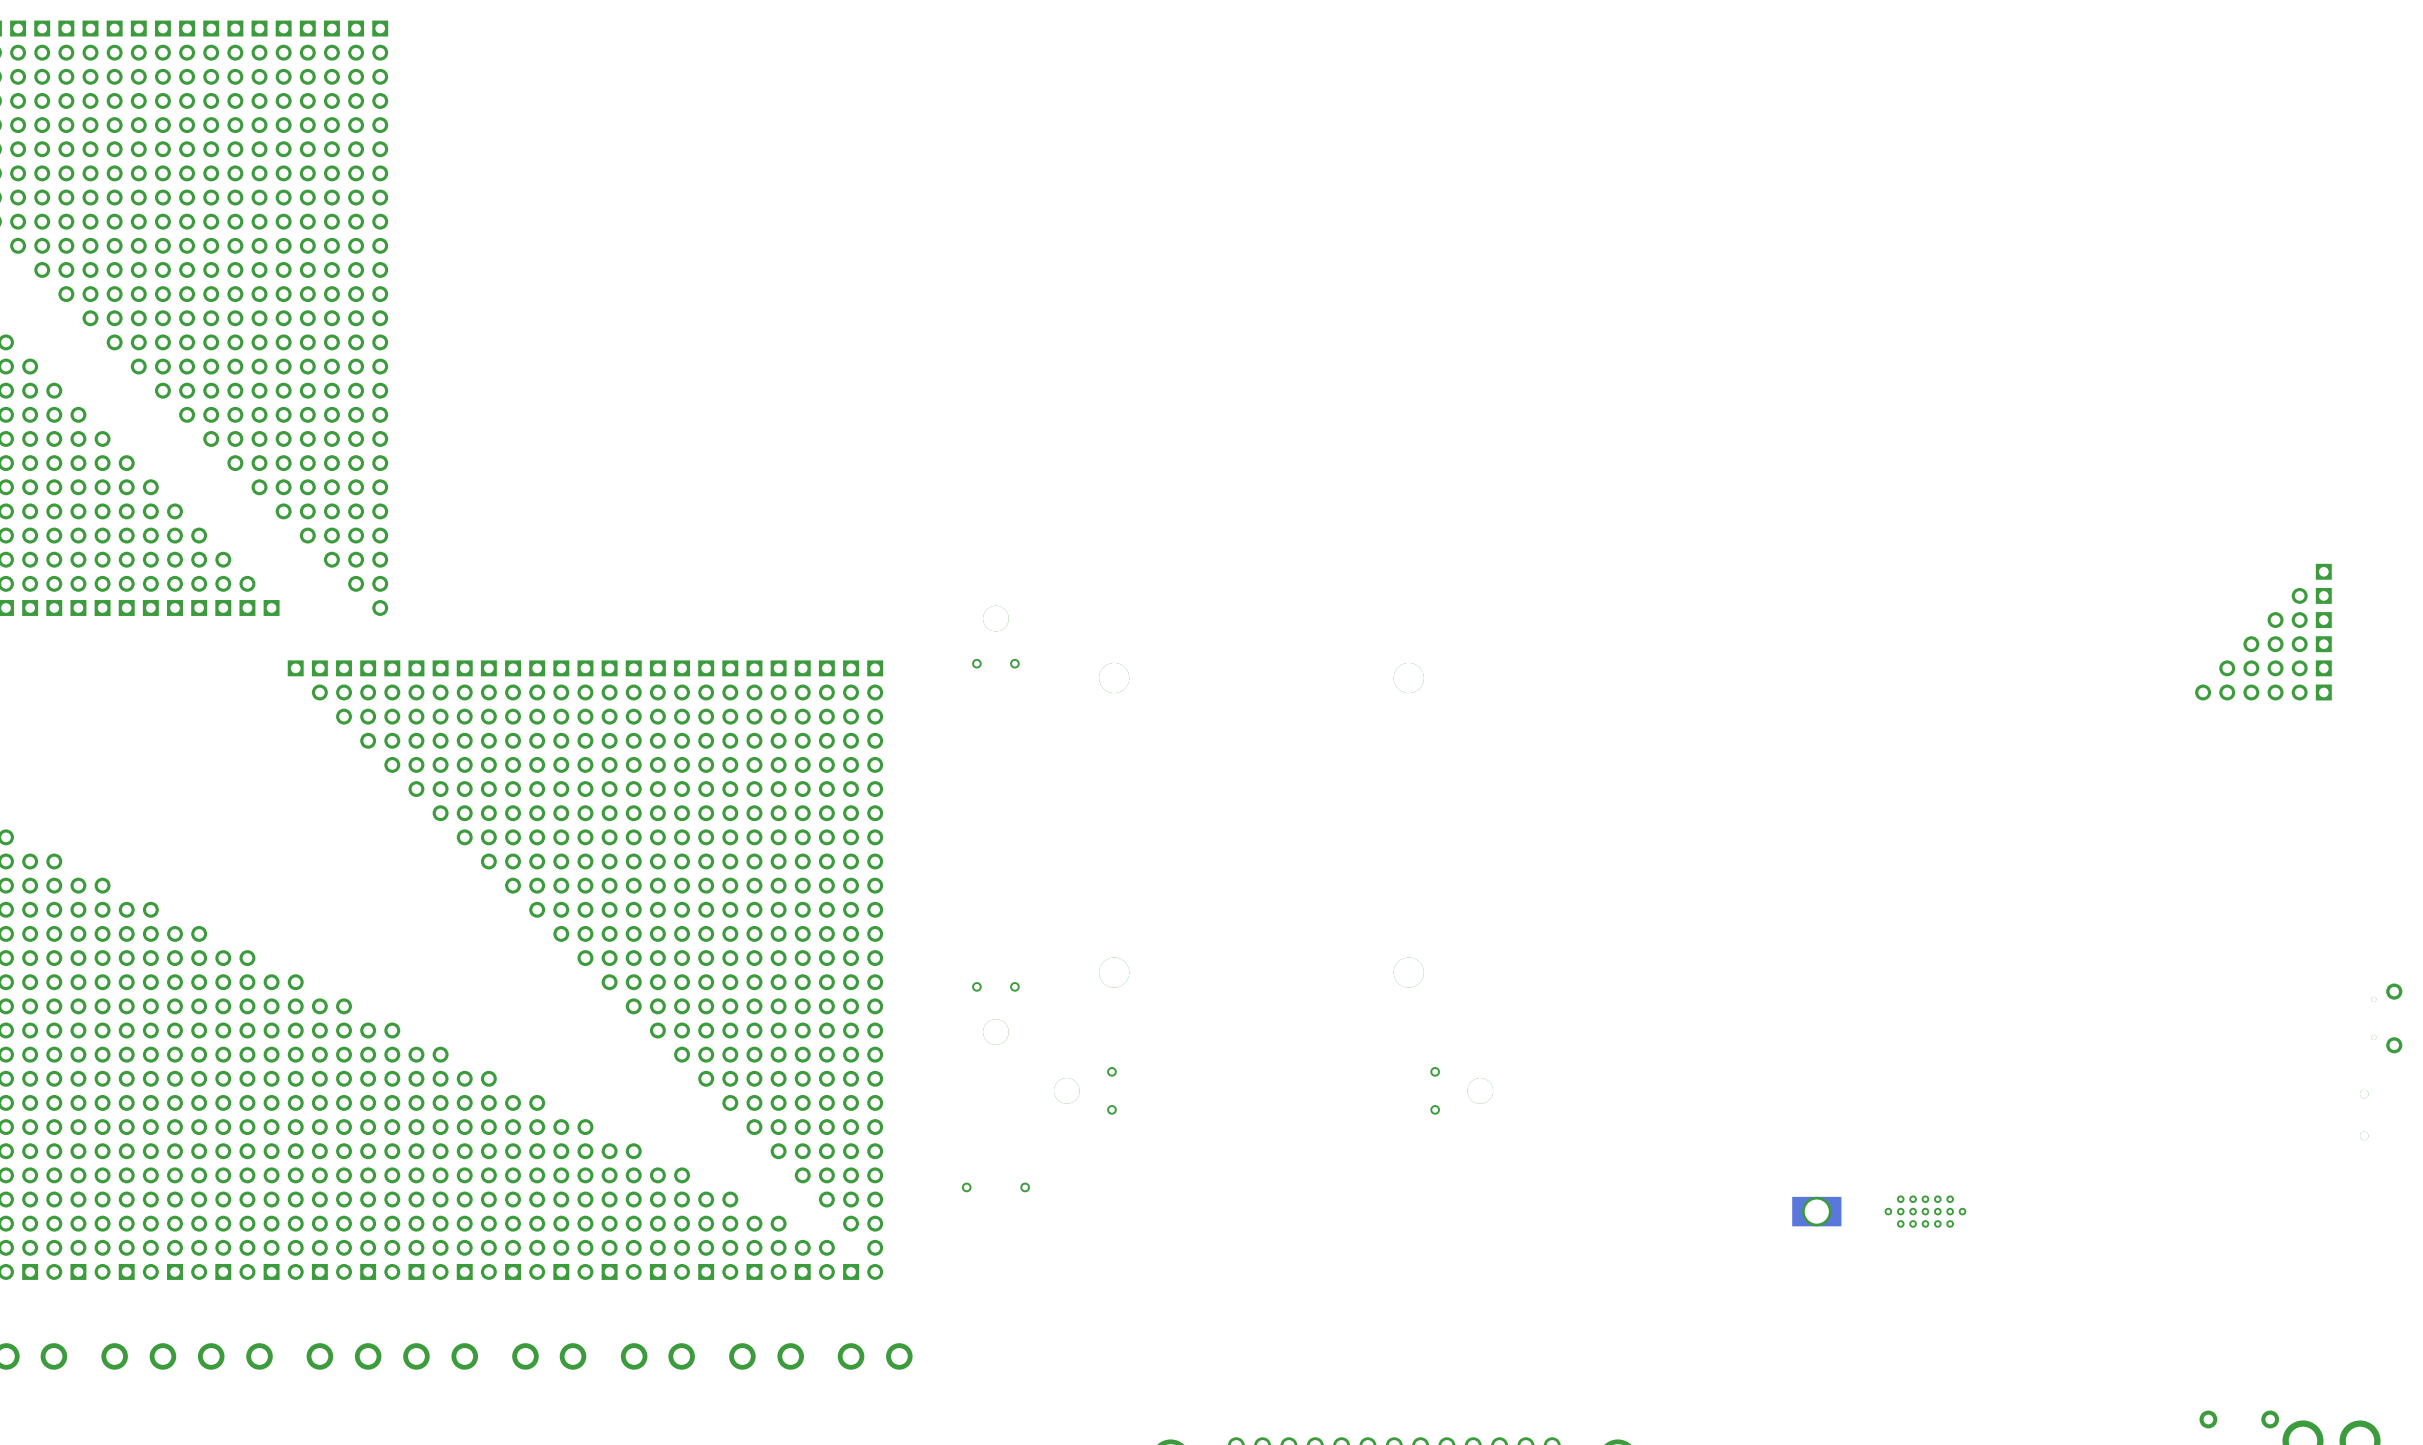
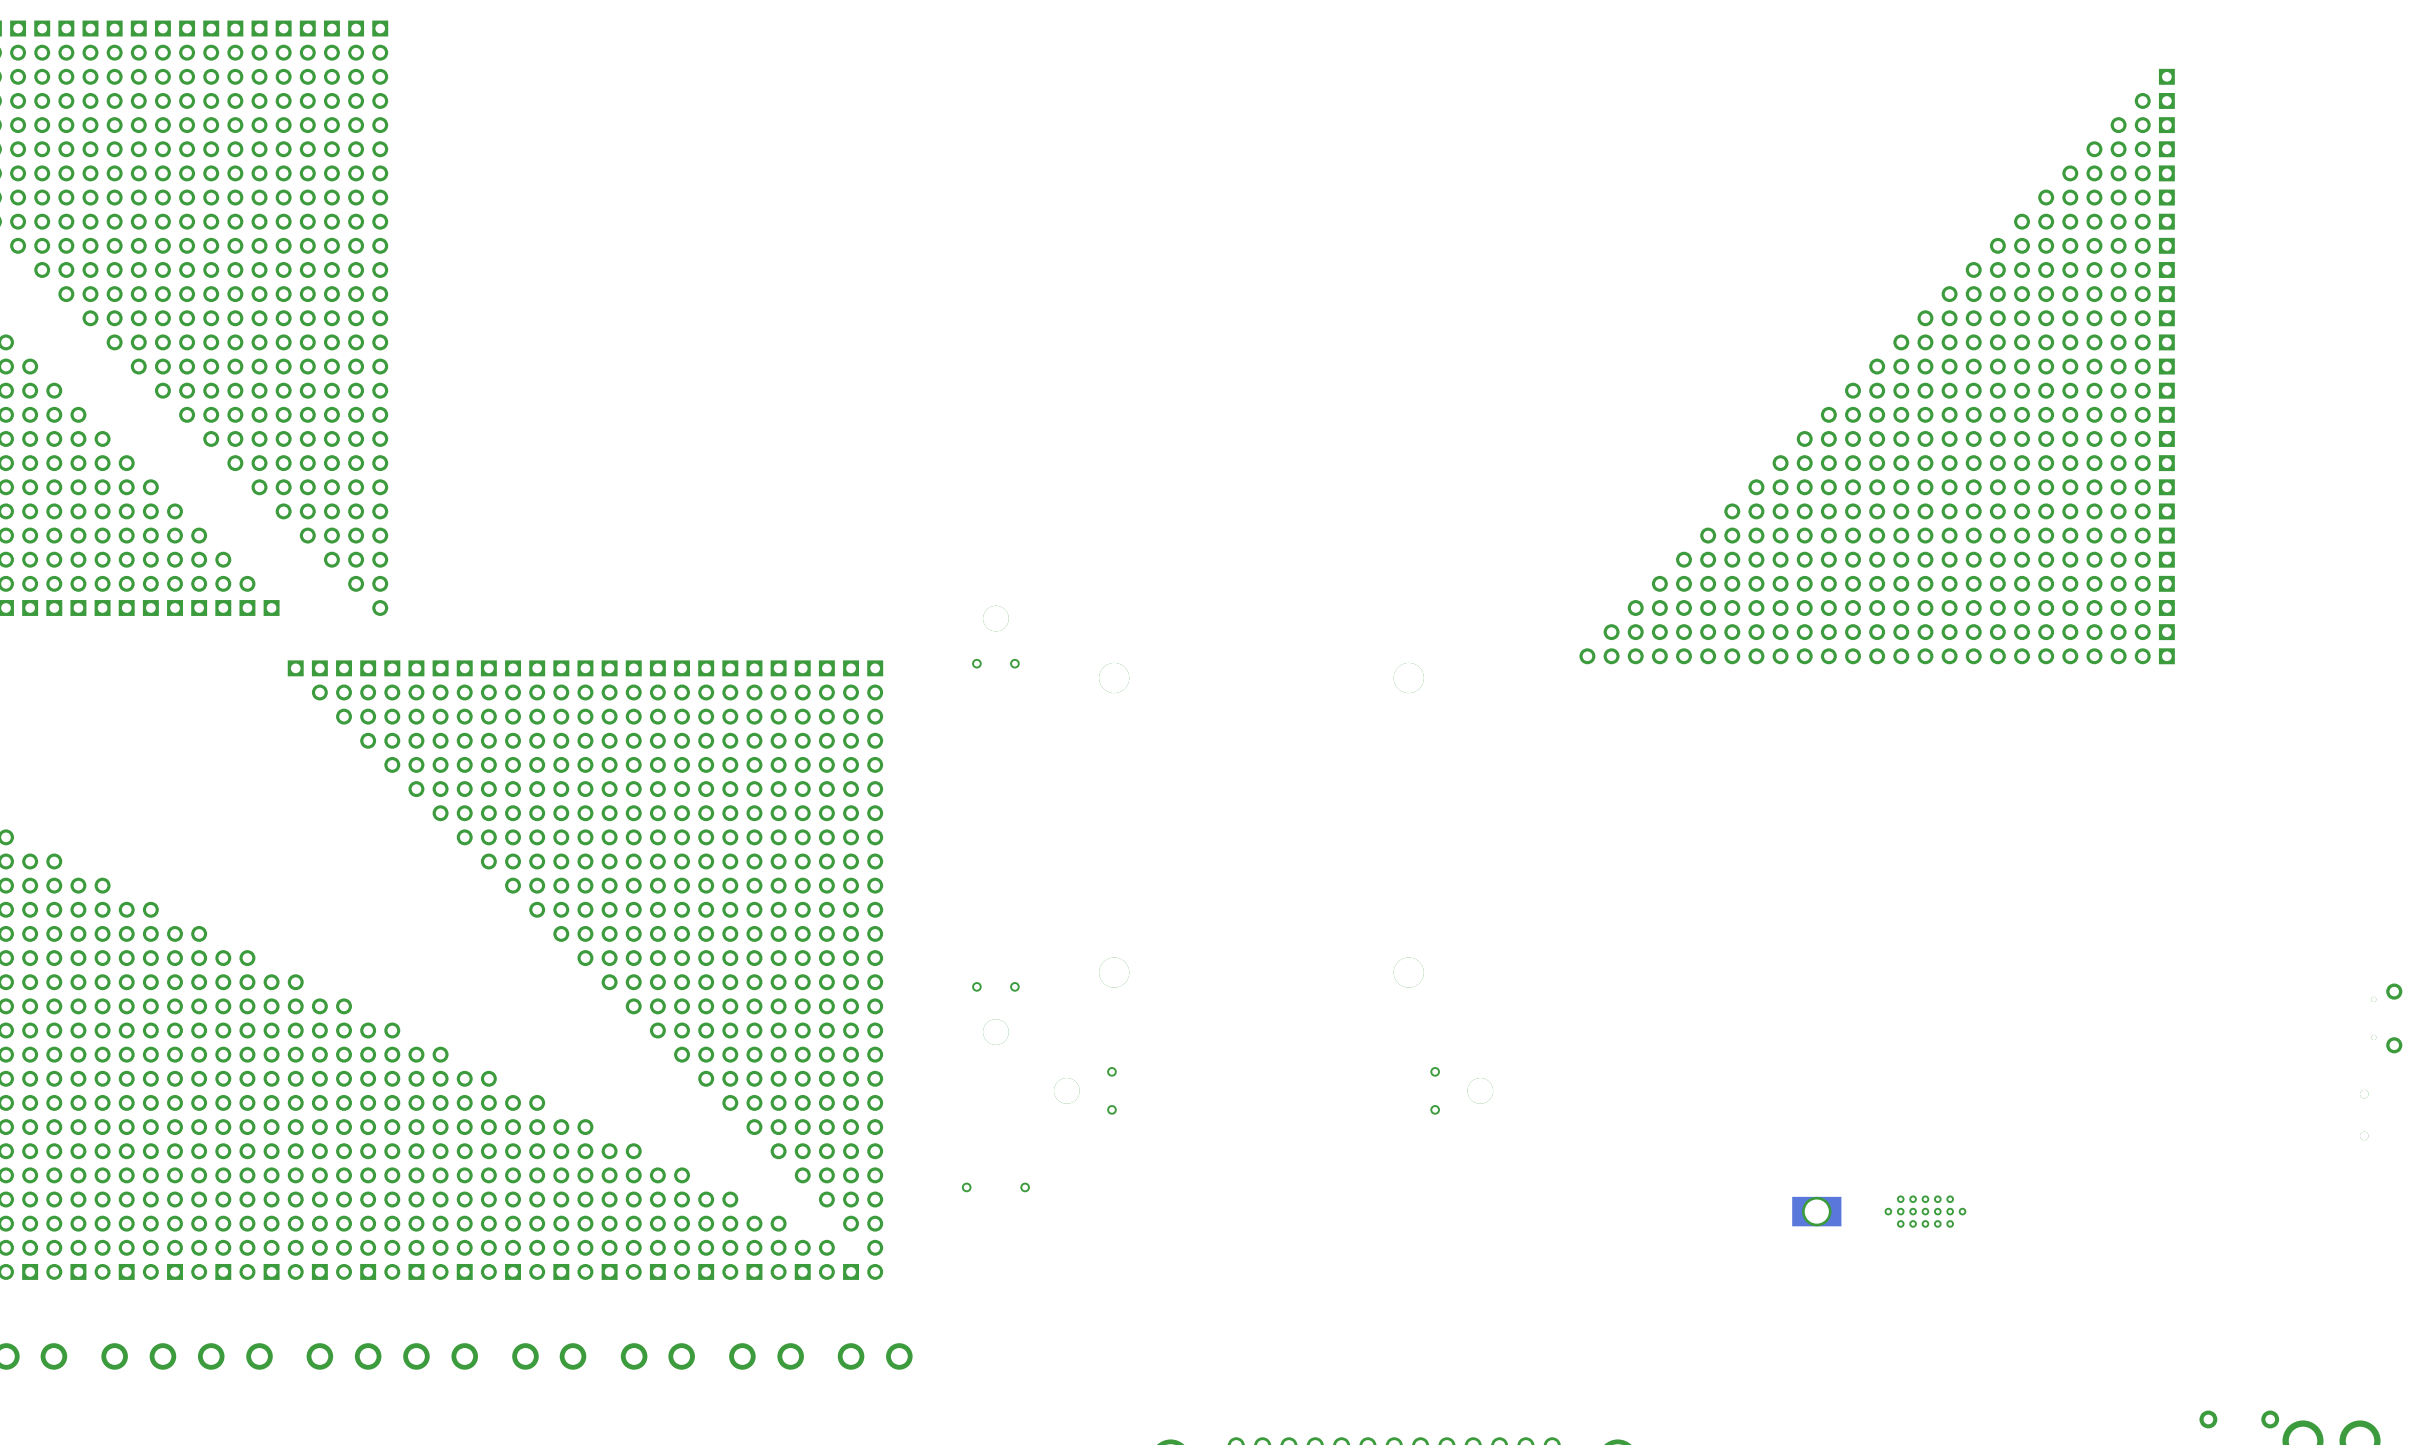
part: none -> (2166, 76)
part: none -> (2154, 100)
part: none -> (2142, 125)
part: none -> (2130, 149)
part: none -> (2118, 173)
part: none -> (2106, 197)
part: none -> (2094, 221)
part: none -> (2082, 245)
part: none -> (2070, 269)
part: none -> (2058, 294)
part: none -> (2046, 318)
part: none -> (2034, 342)
part: none -> (2022, 366)
part: none -> (2009, 390)
part: none -> (1997, 414)
part: none -> (1985, 438)
part: none -> (1973, 463)
part: none -> (1961, 487)
part: none -> (1949, 511)
part: none -> (1937, 535)
part: none -> (1925, 559)
part: (2323, 571) -> none
part: none -> (1913, 583)
part: (2311, 595) -> none
part: none -> (1901, 607)
part: (2299, 620) -> none
part: none -> (1889, 632)
part: (2287, 644) -> none
part: none -> (1877, 656)
part: (2275, 668) -> none
part: (2263, 692) -> none

